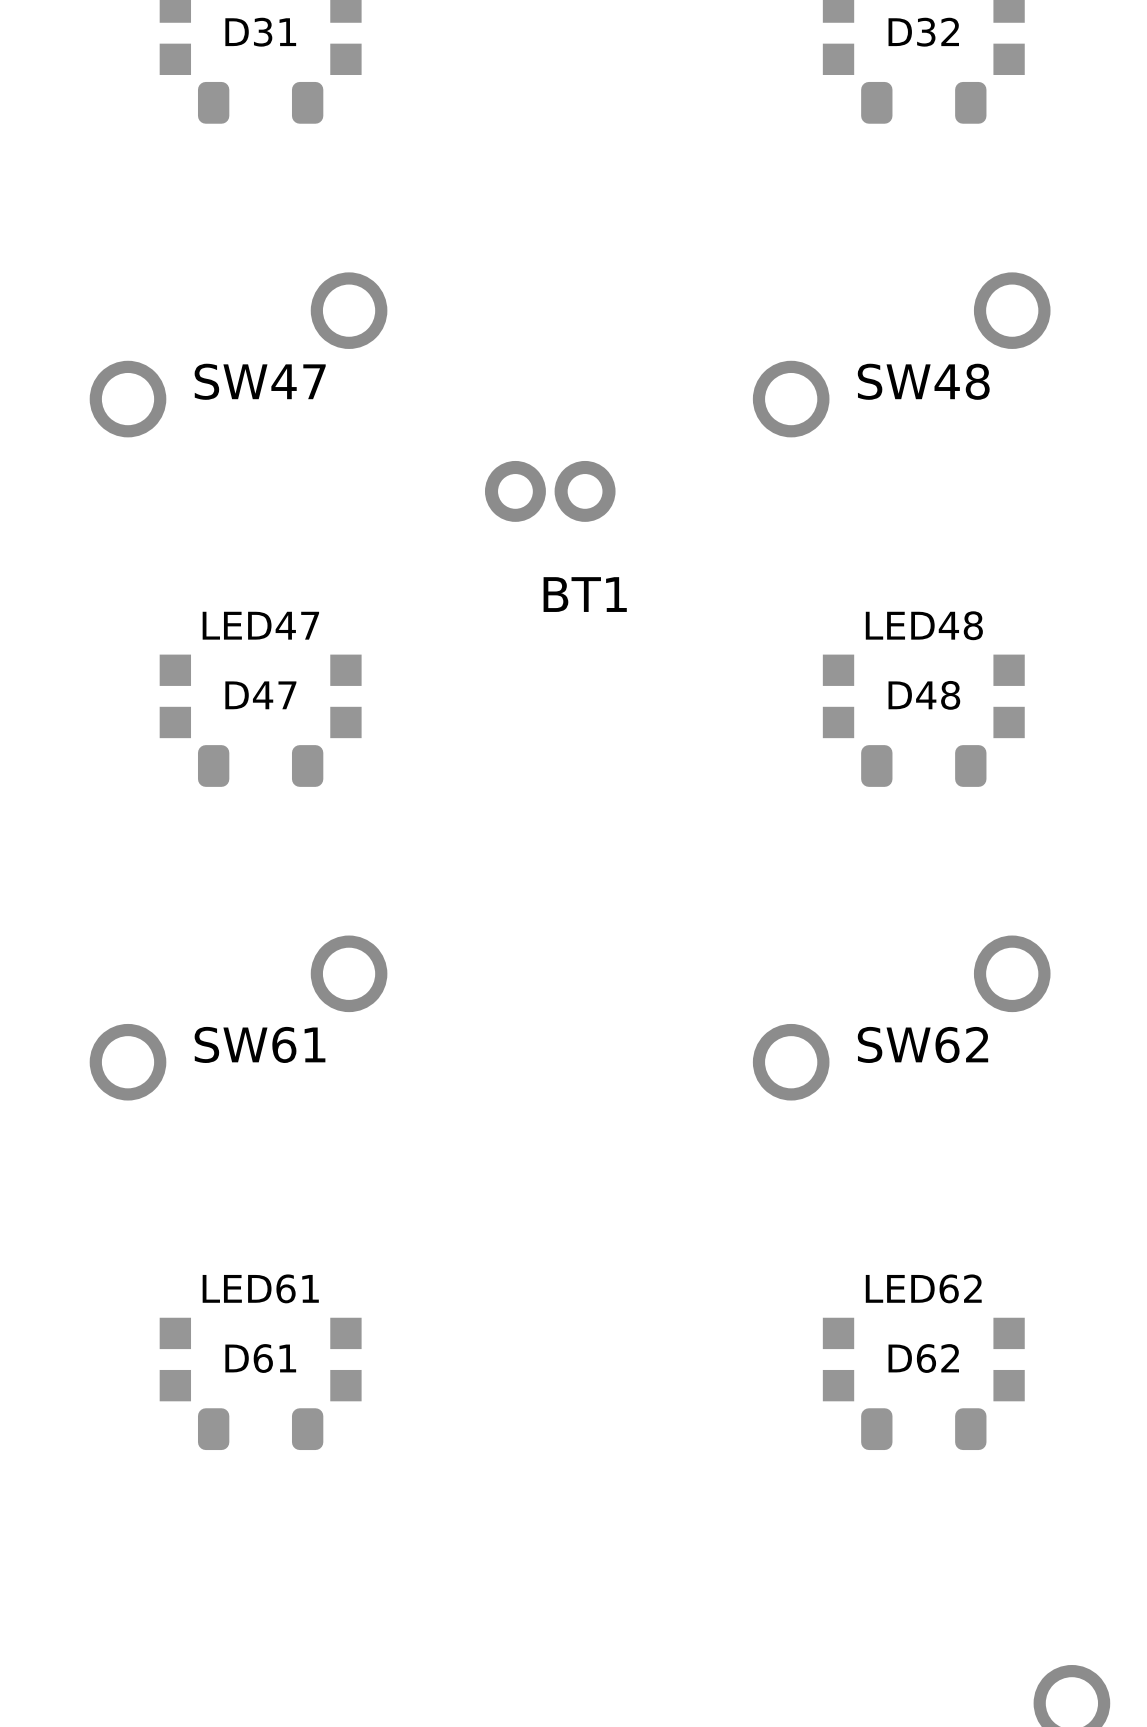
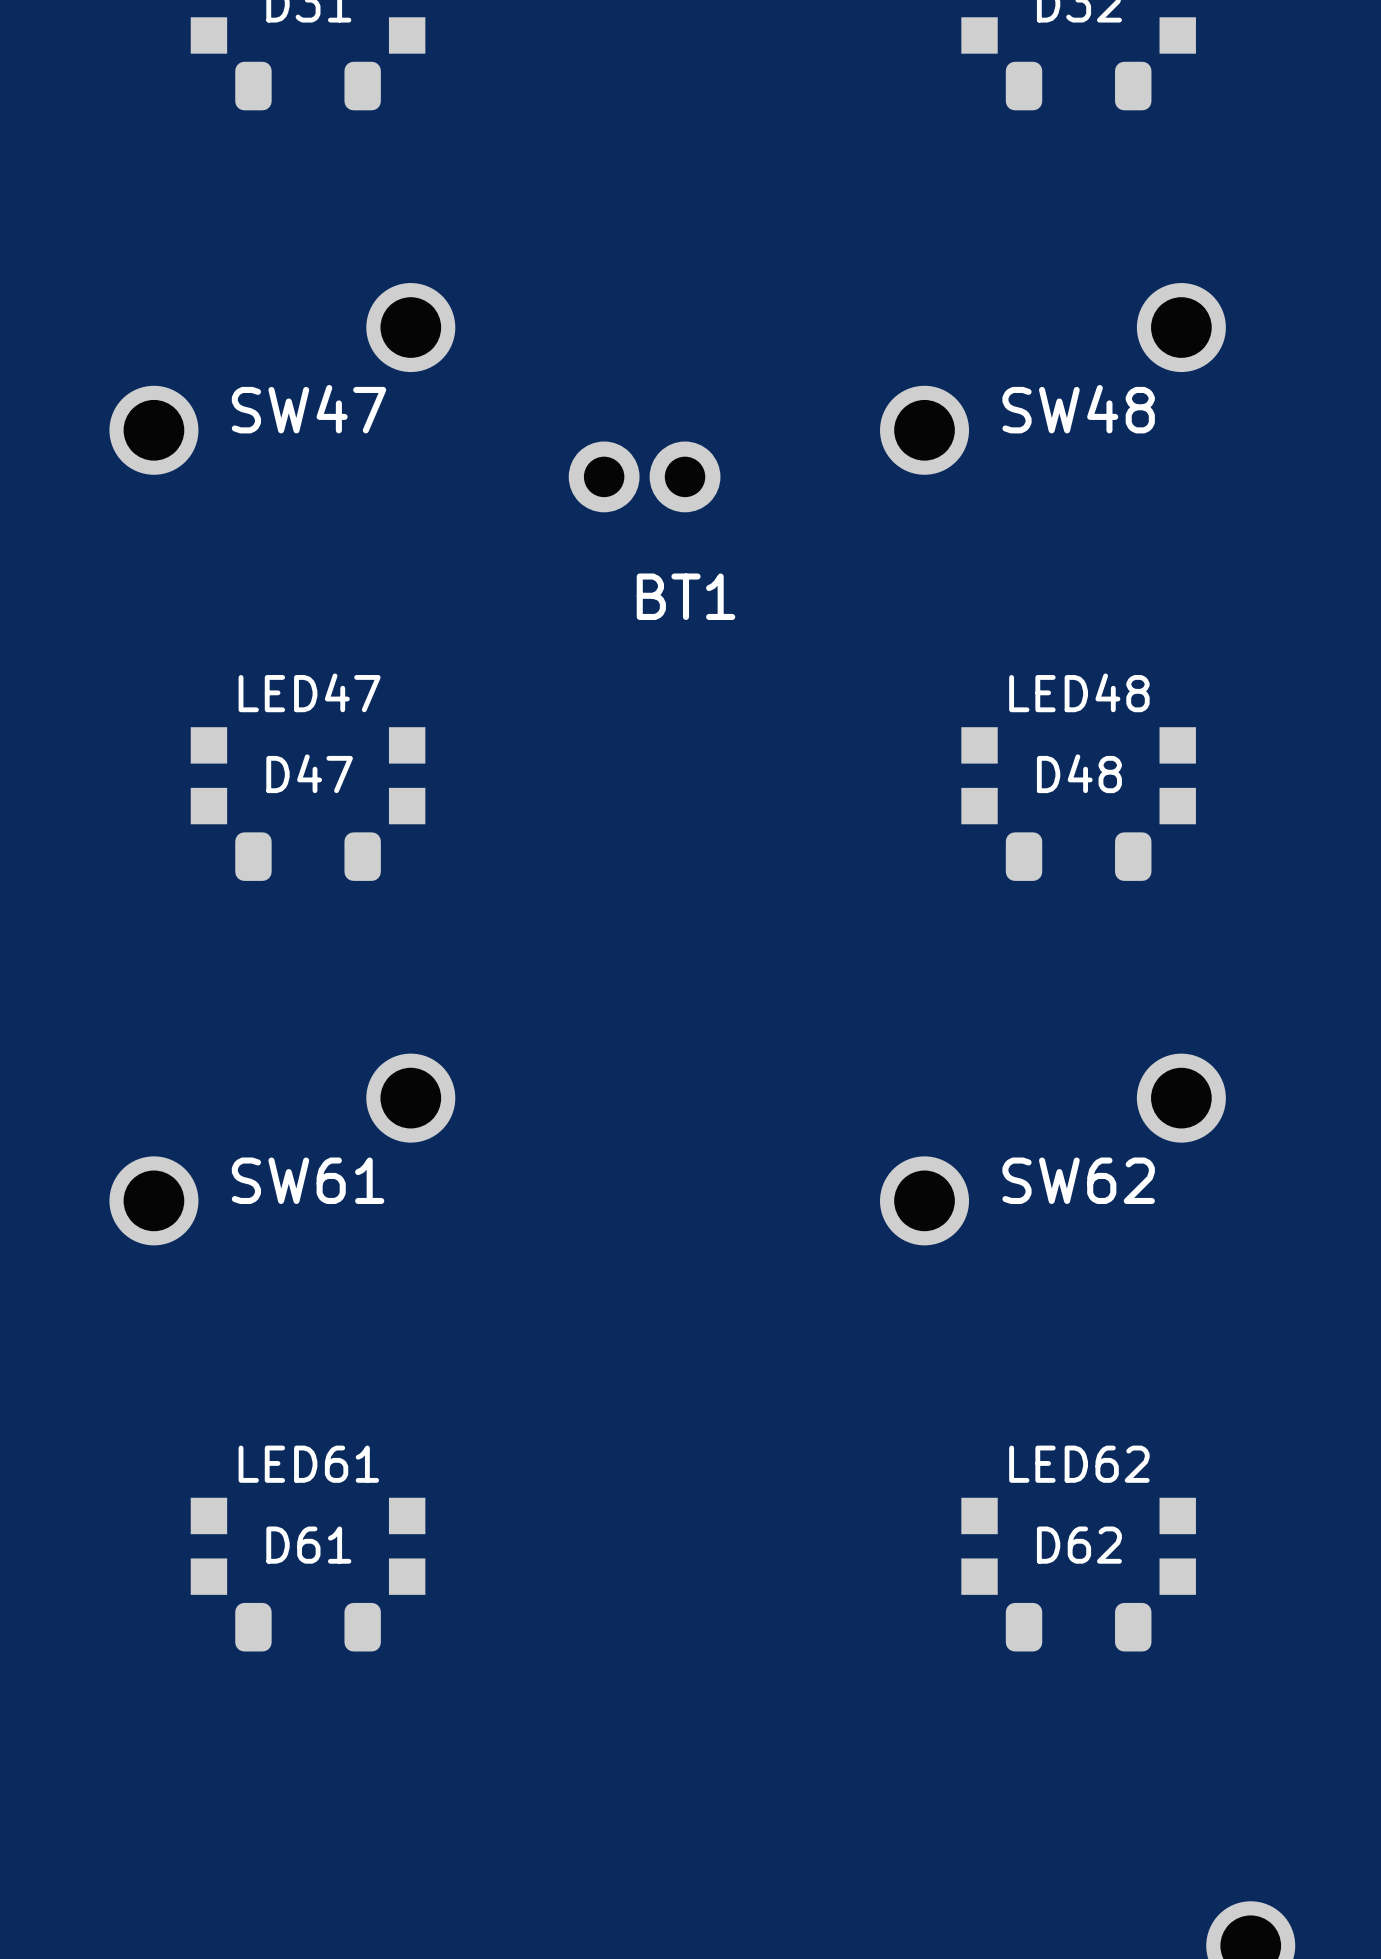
BT1 position: (550, 491) -> (644, 476)

